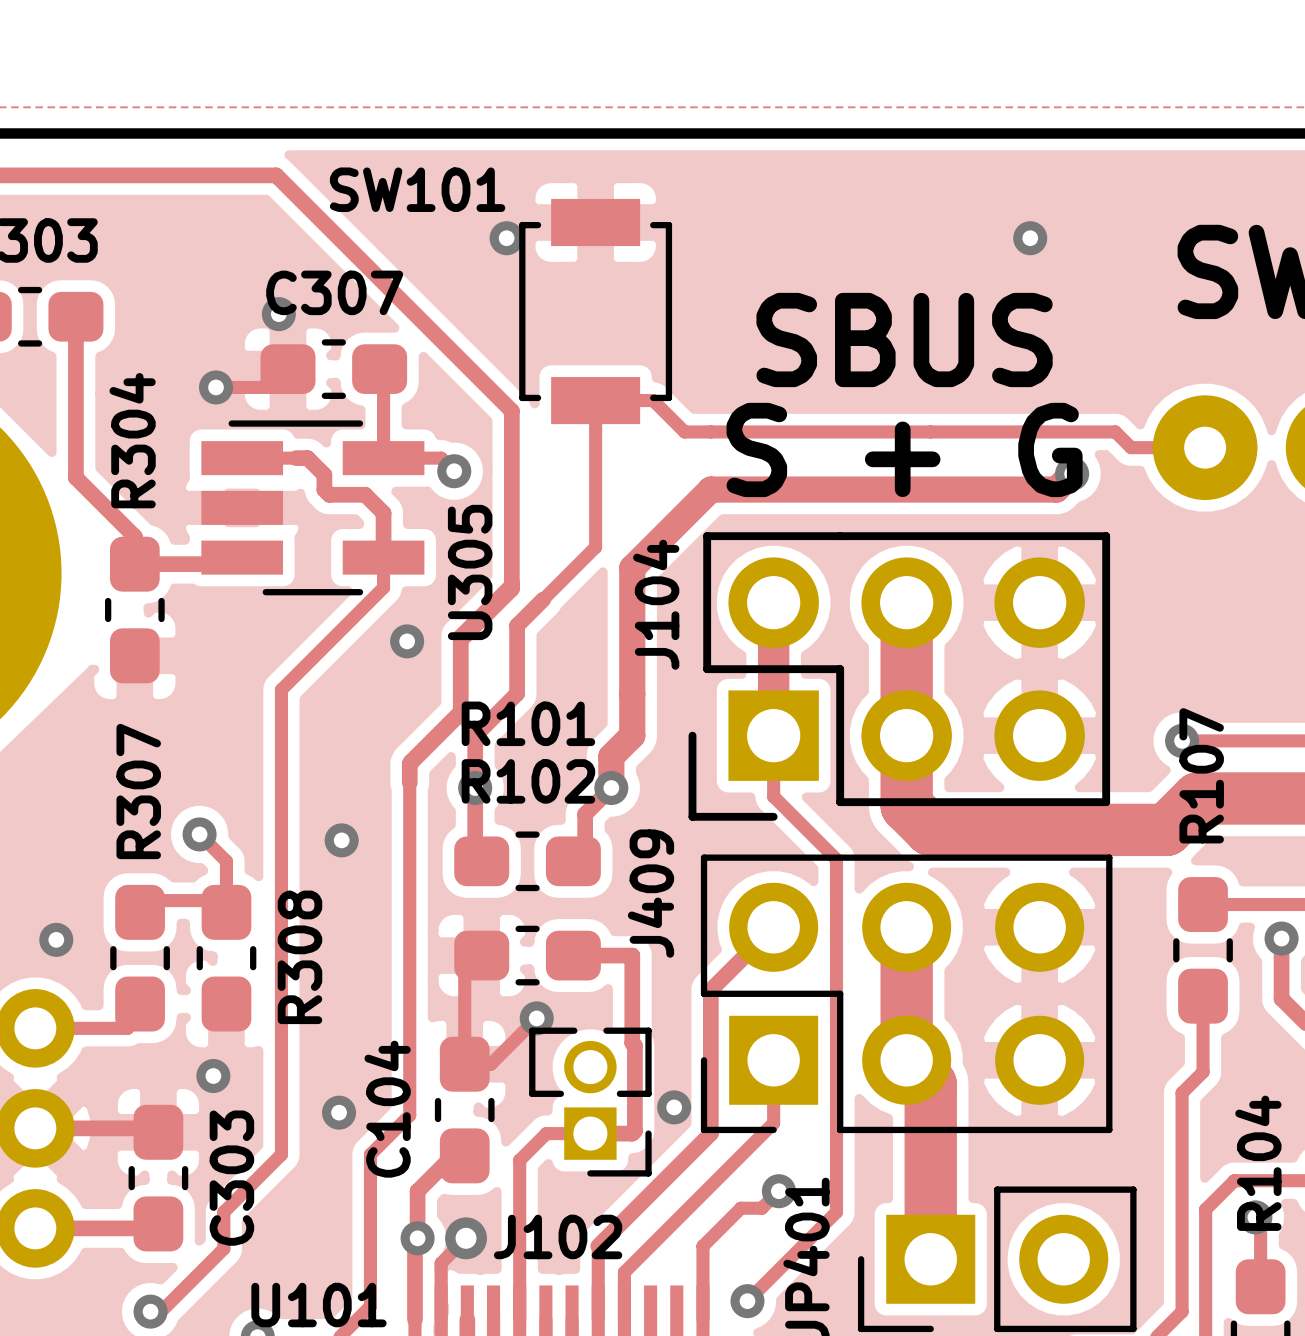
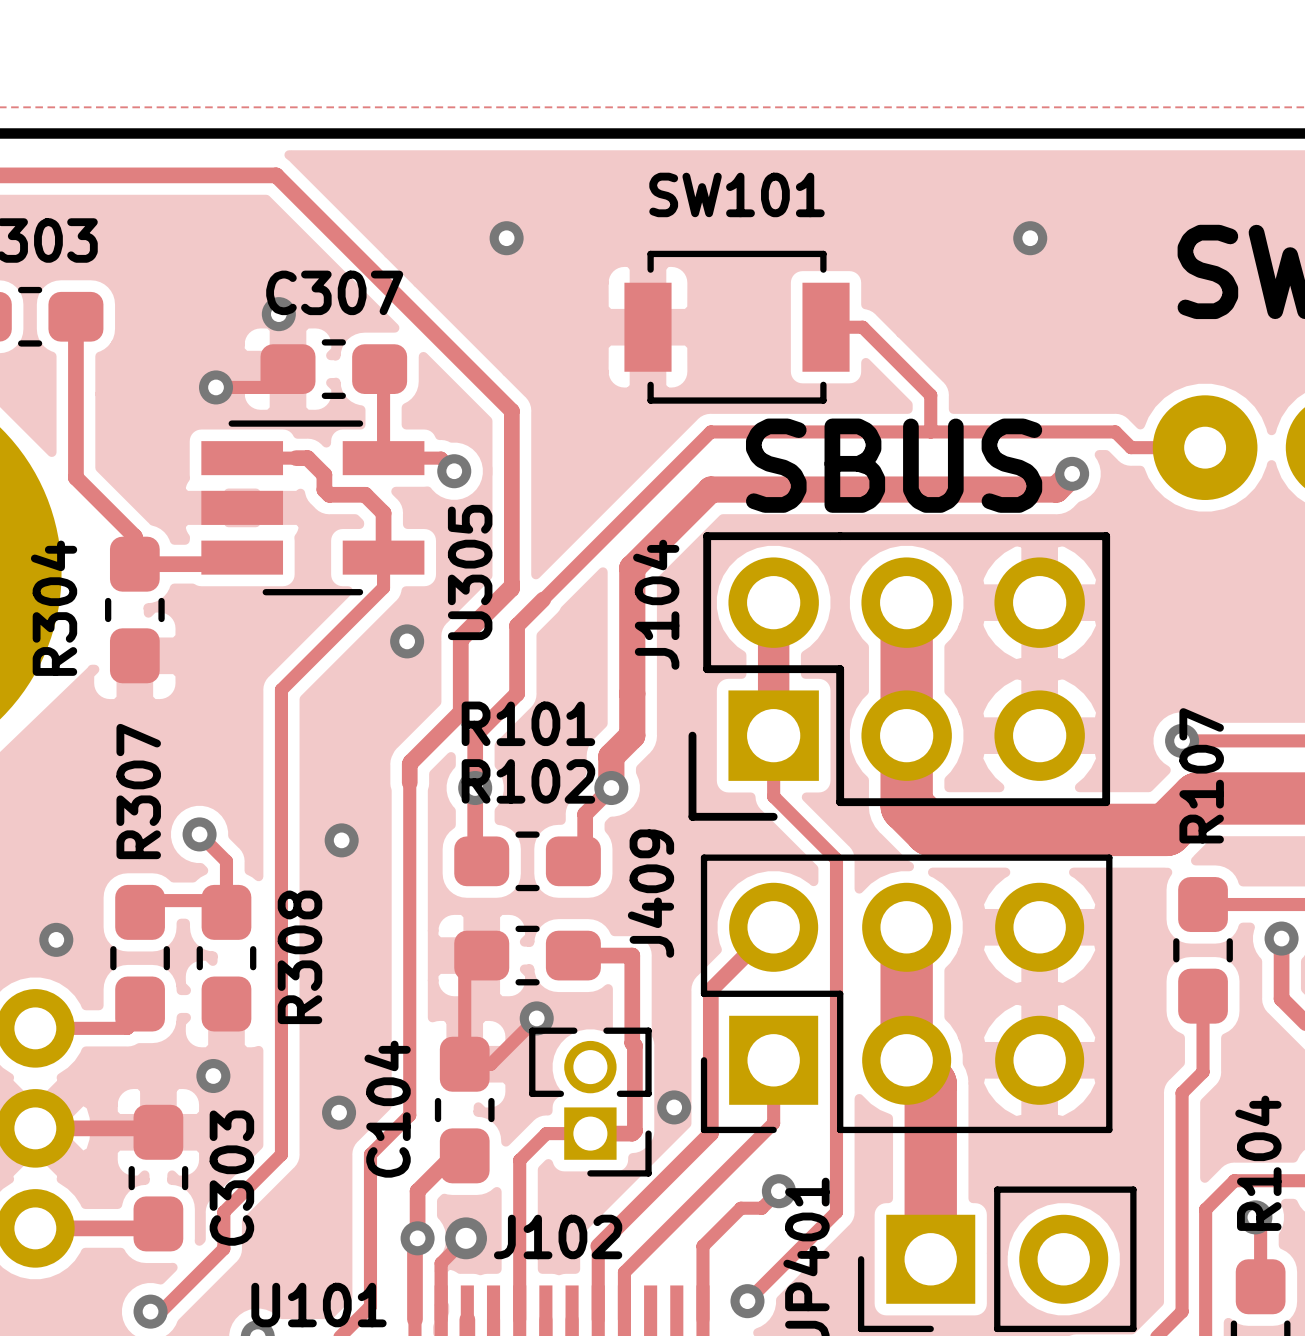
SW101 name position: SW101 (417, 189) -> SW101 (737, 194)
SW101 rotation: 0° (595, 311) -> 90° clockwise (737, 327)
SW101 position: (595, 311) -> (737, 327)
track: none -> (826, 327) (862, 327) (930, 395) (930, 431)
text: SBUS (904, 340) -> none
track: (710, 431) (684, 431) (653, 400) (595, 400) (595, 547) -> (710, 431) (595, 547)
R304 name position: R304 (132, 440) -> R304 (54, 608)
text: S + G (904, 449) -> SBUS (894, 465)

